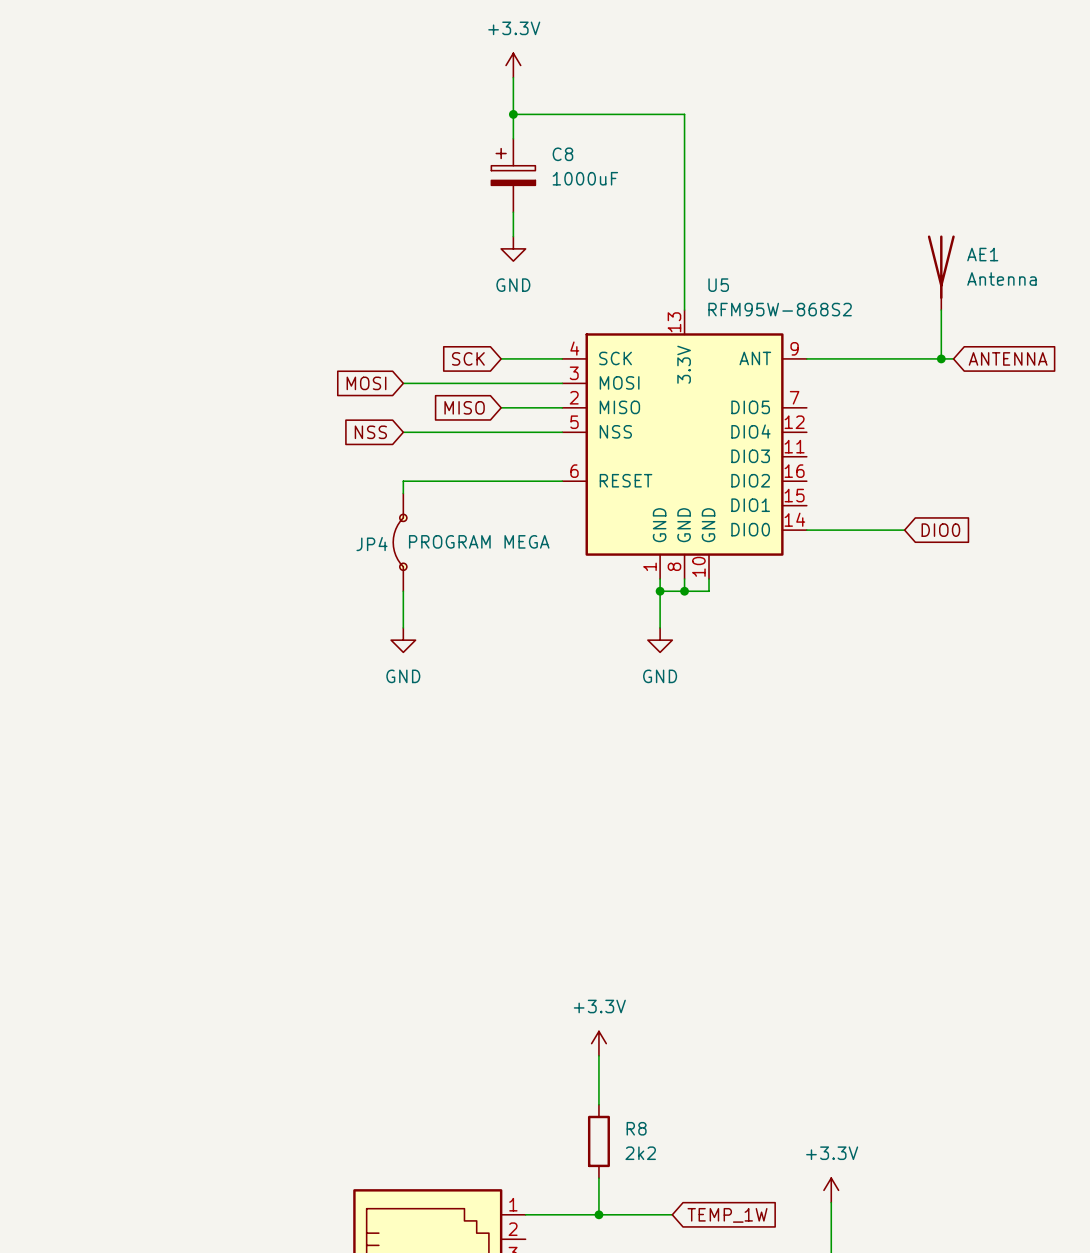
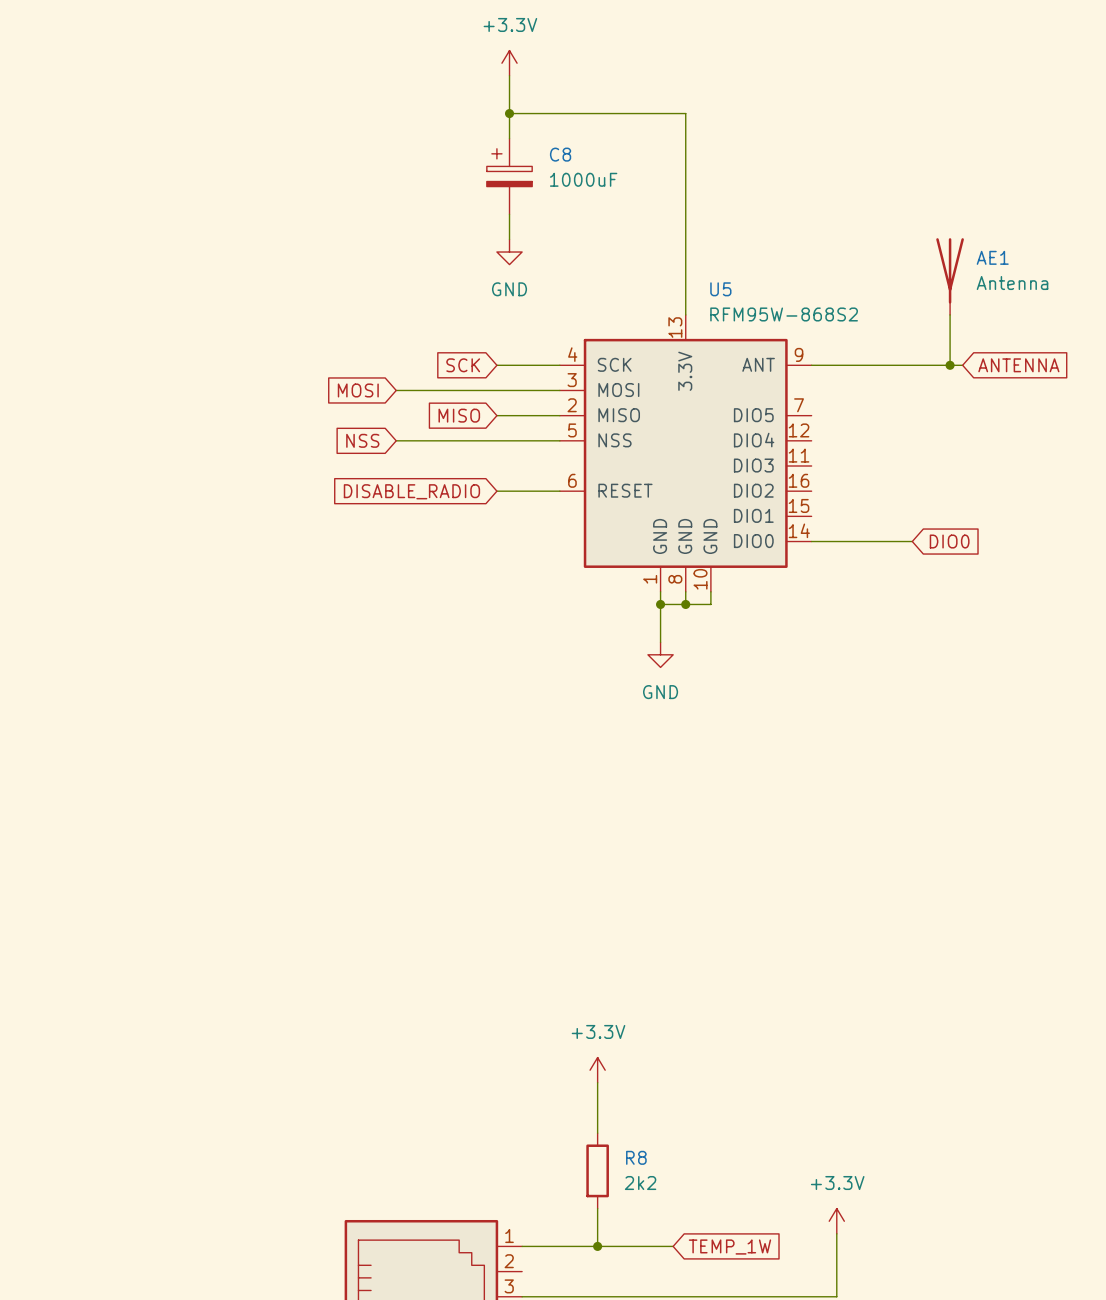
global label: none -> DISABLE_RADIO (411, 491)
wire: (501, 481) (403, 481) (403, 493) -> none
JP4: PROGRAM MEGA (400, 542) -> none
wire: (403, 591) (403, 627) -> none
power symbol: GND (403, 640) -> none

